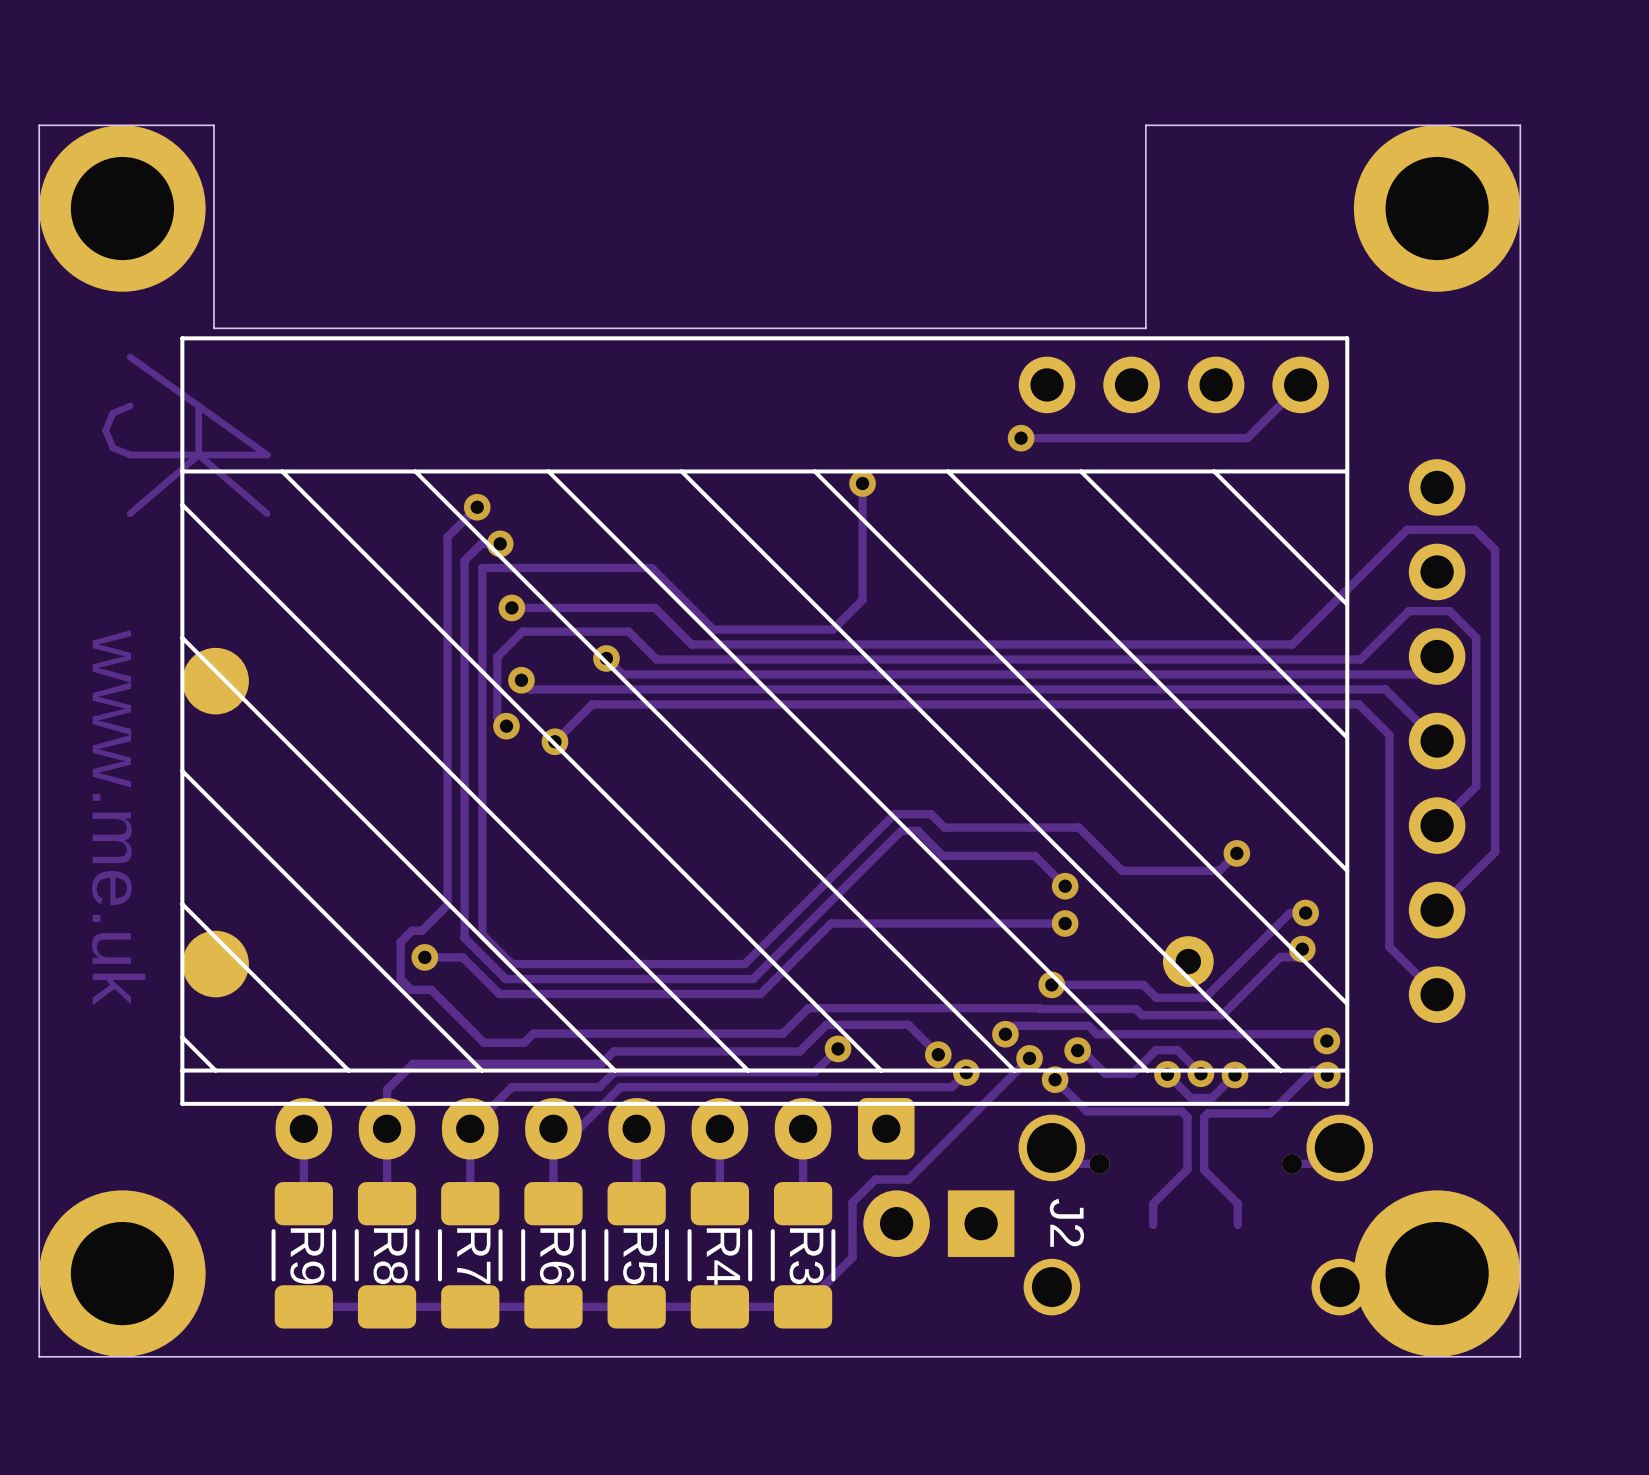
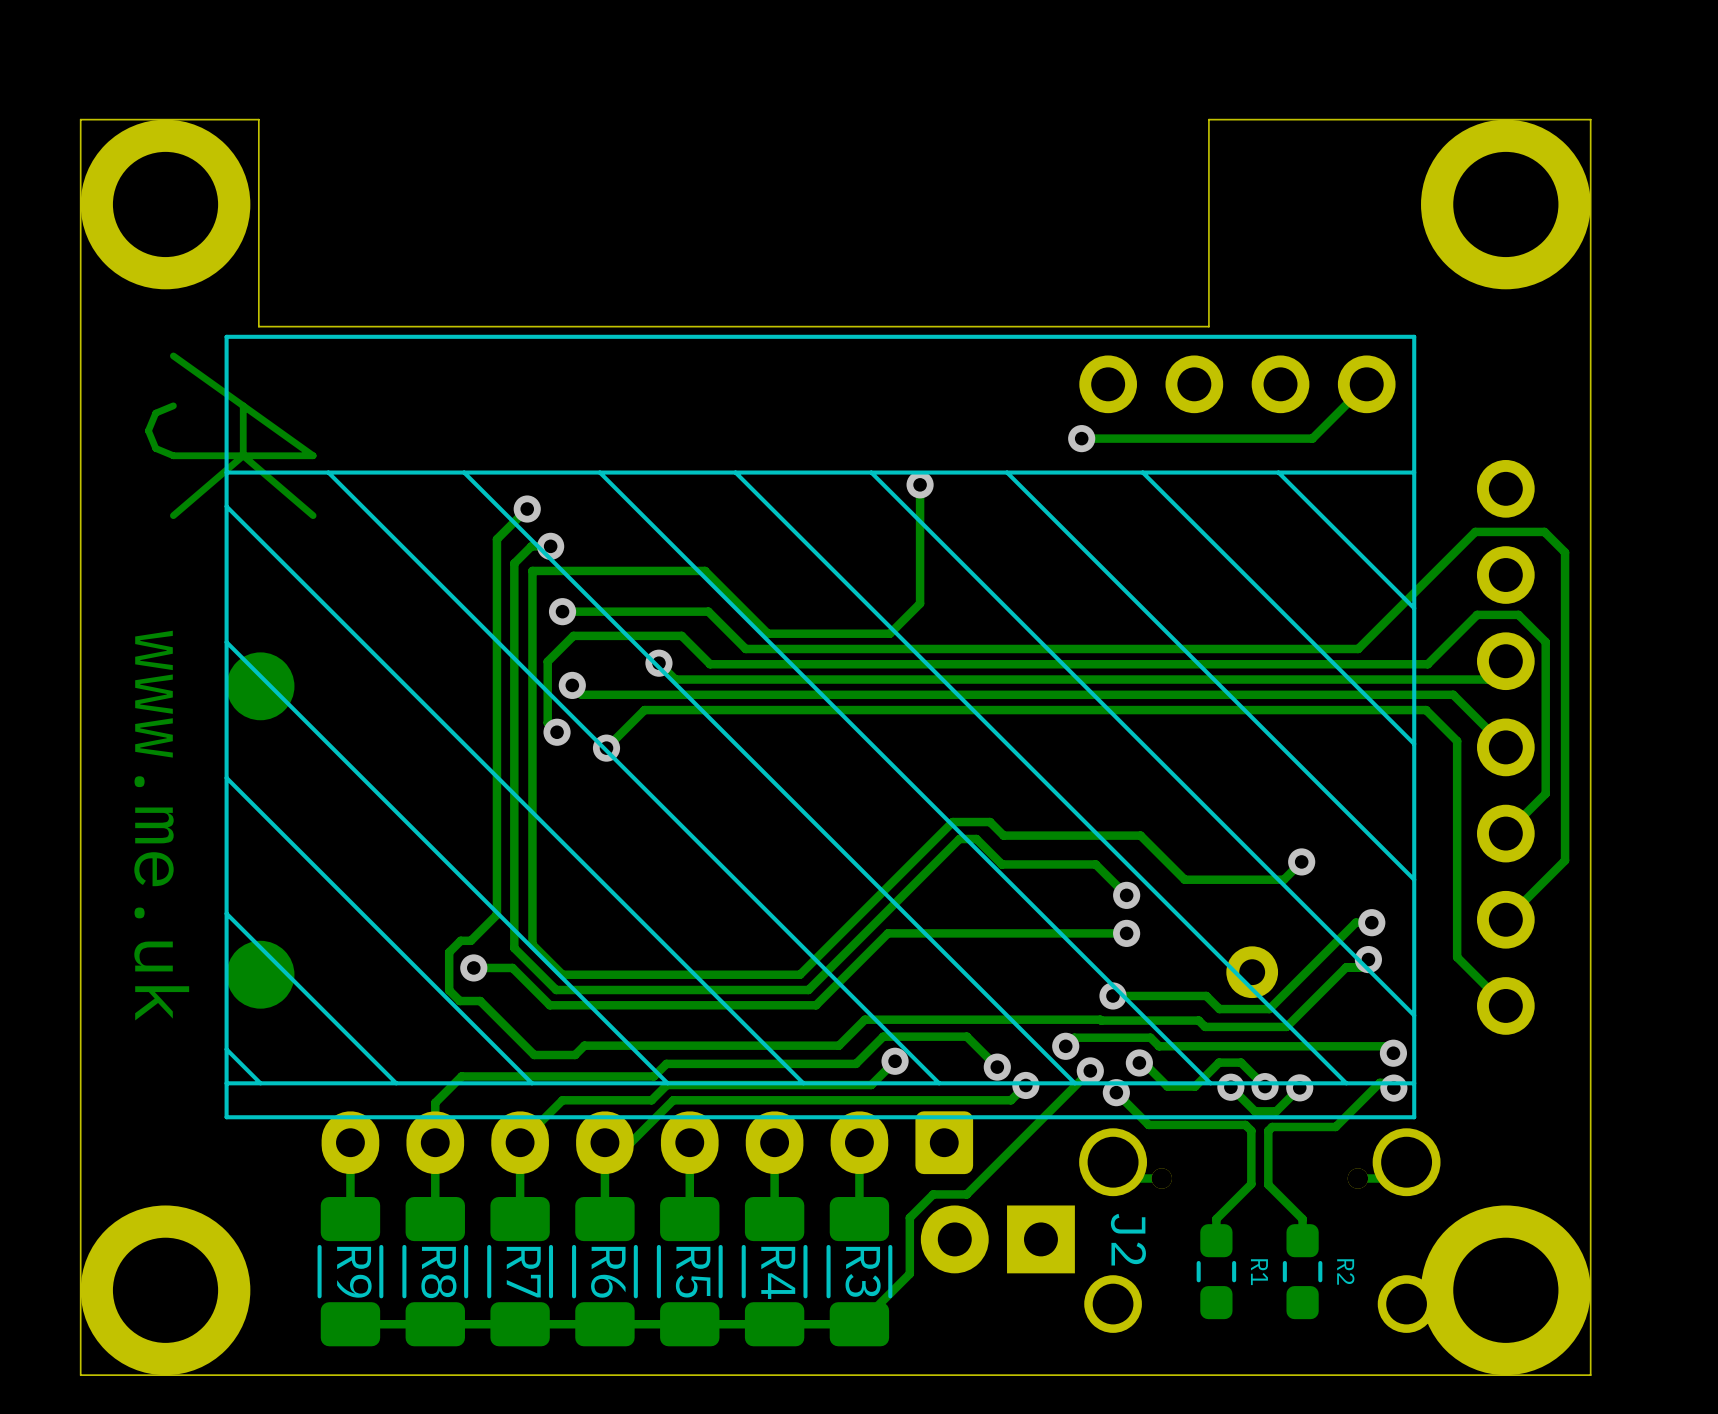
R1: none -> (1216, 1271)
R2: none -> (1302, 1271)

